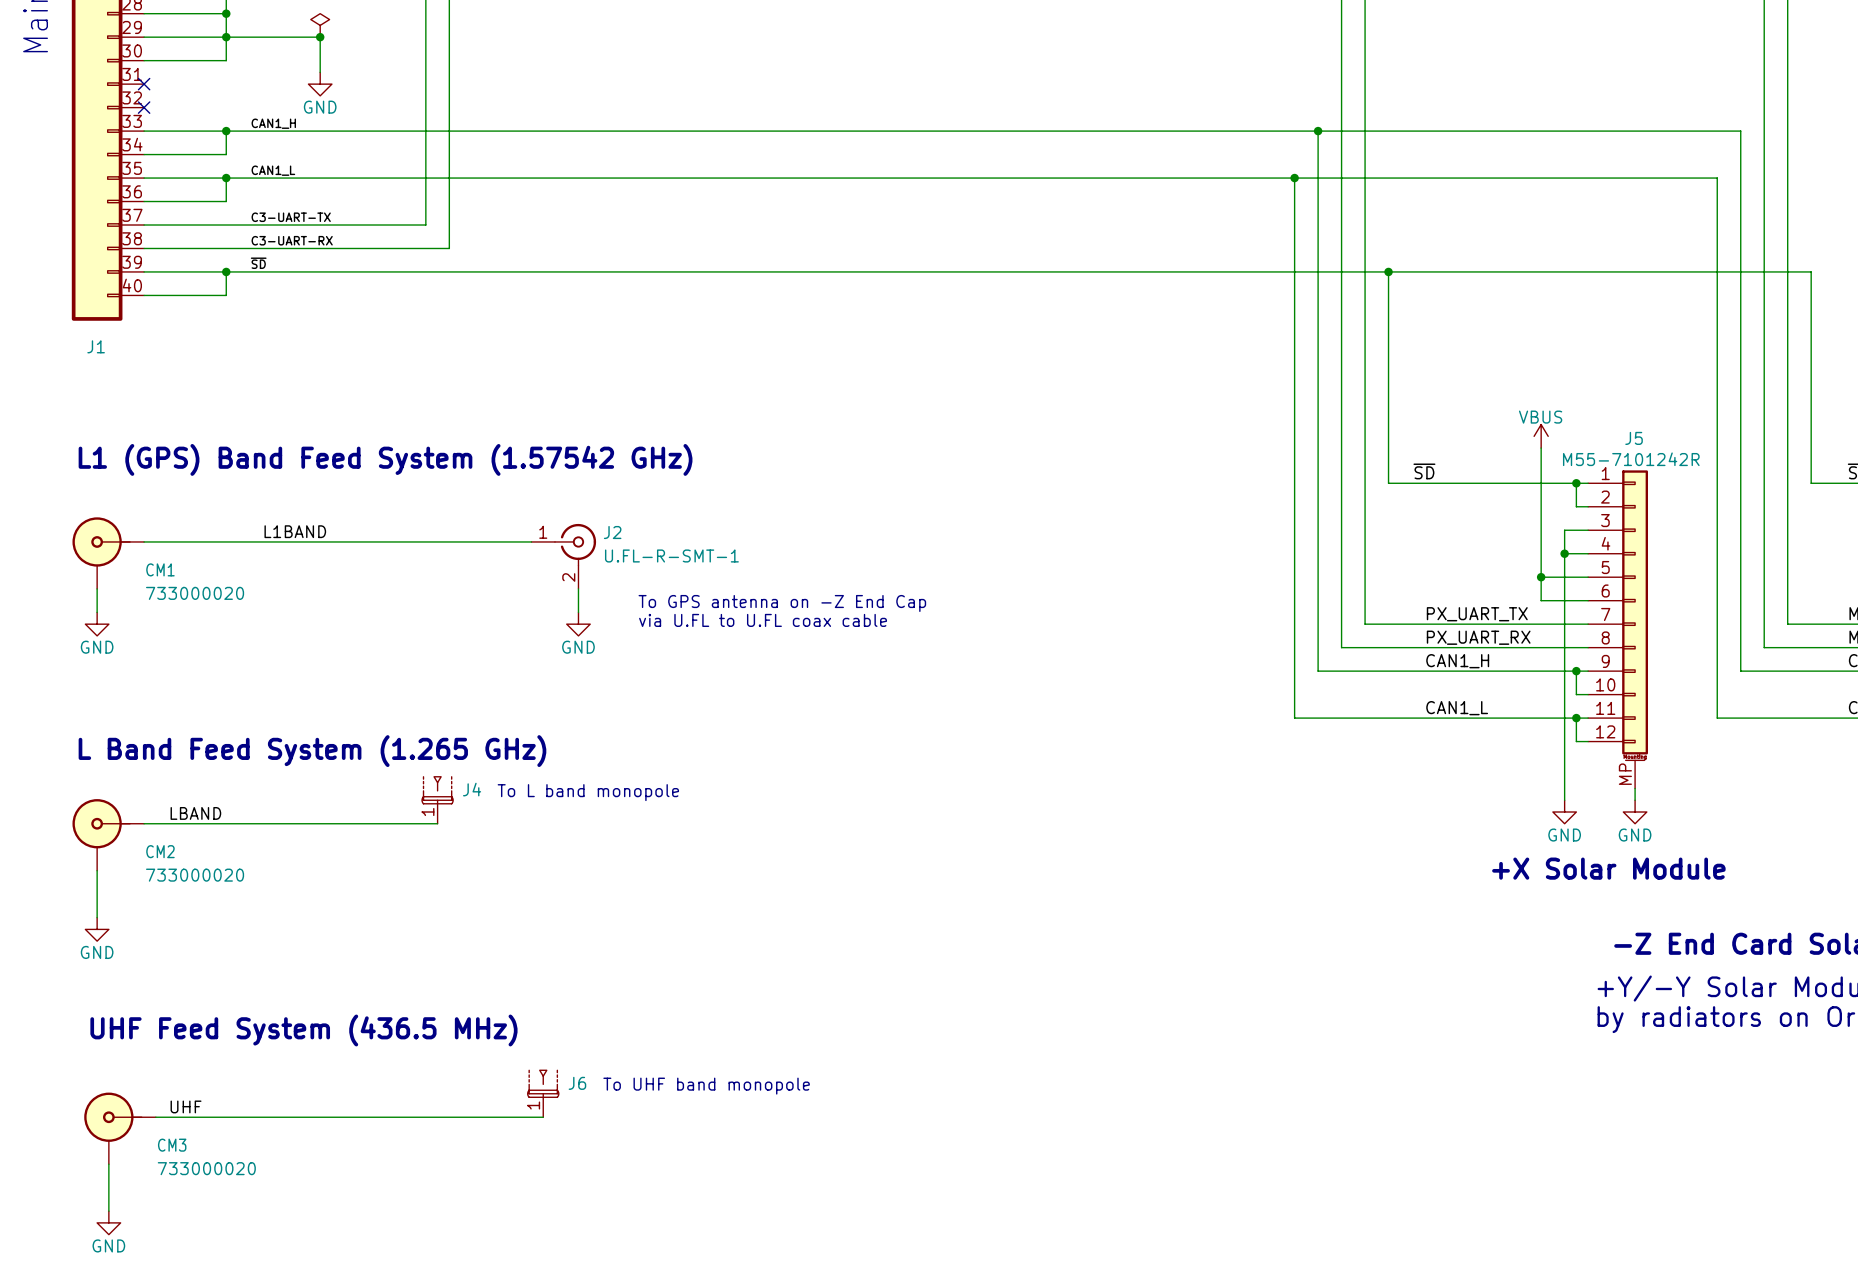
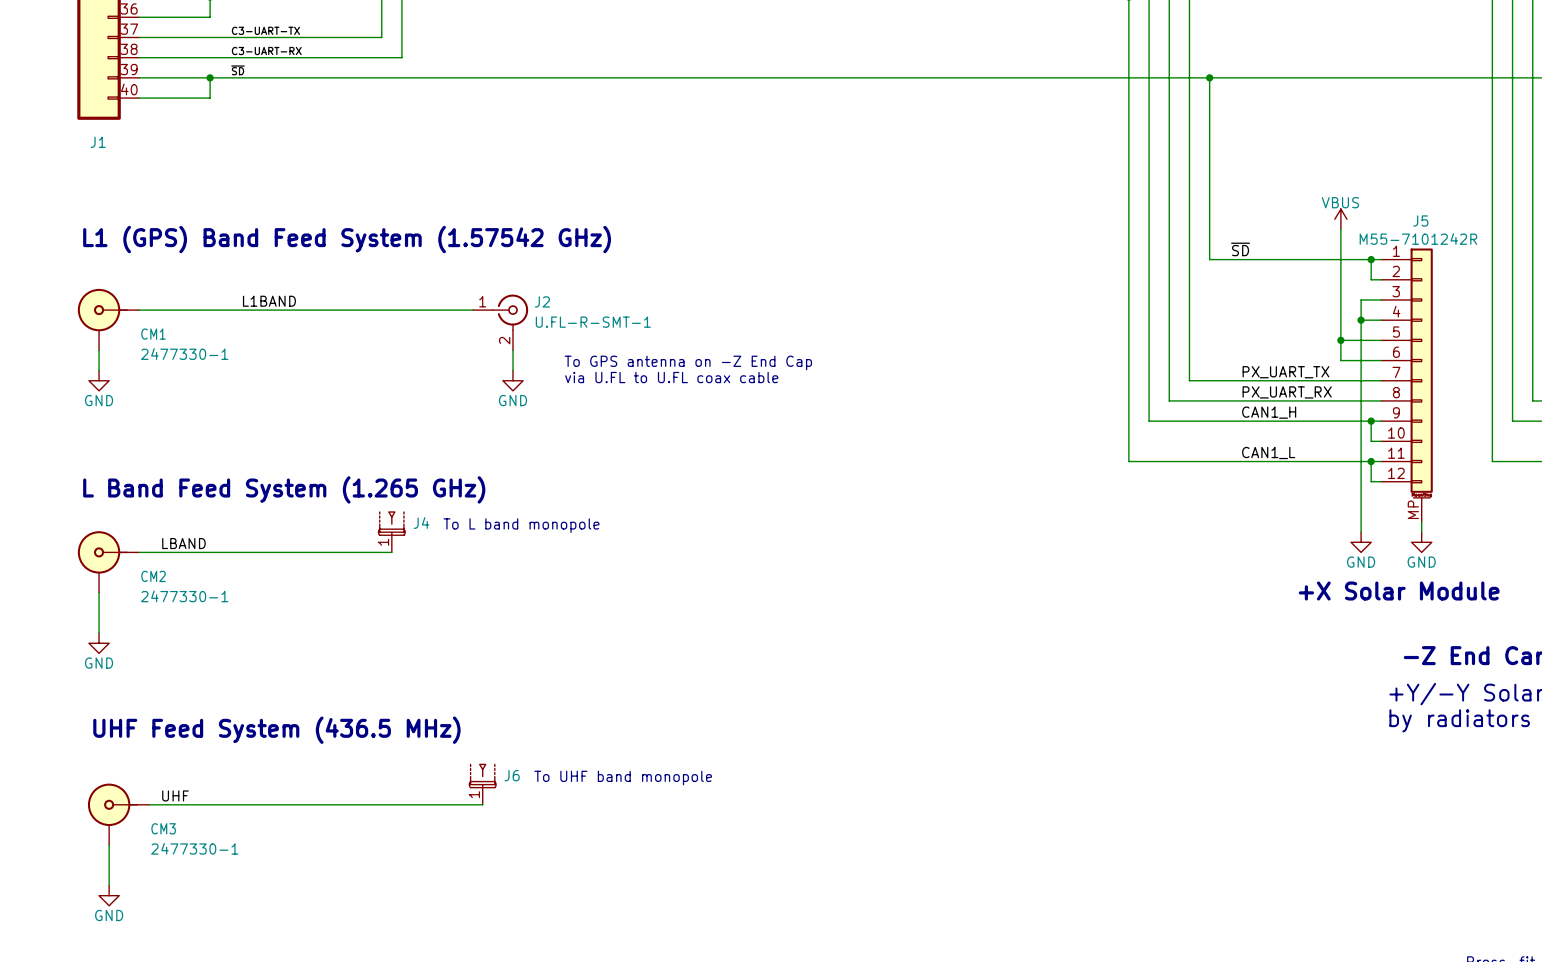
CM1 value: 733000020 (195, 593) -> 2477330-1 (184, 354)
CM2 value: 733000020 (195, 875) -> 2477330-1 (184, 596)
CM3 value: 733000020 (206, 1168) -> 2477330-1 (194, 848)

